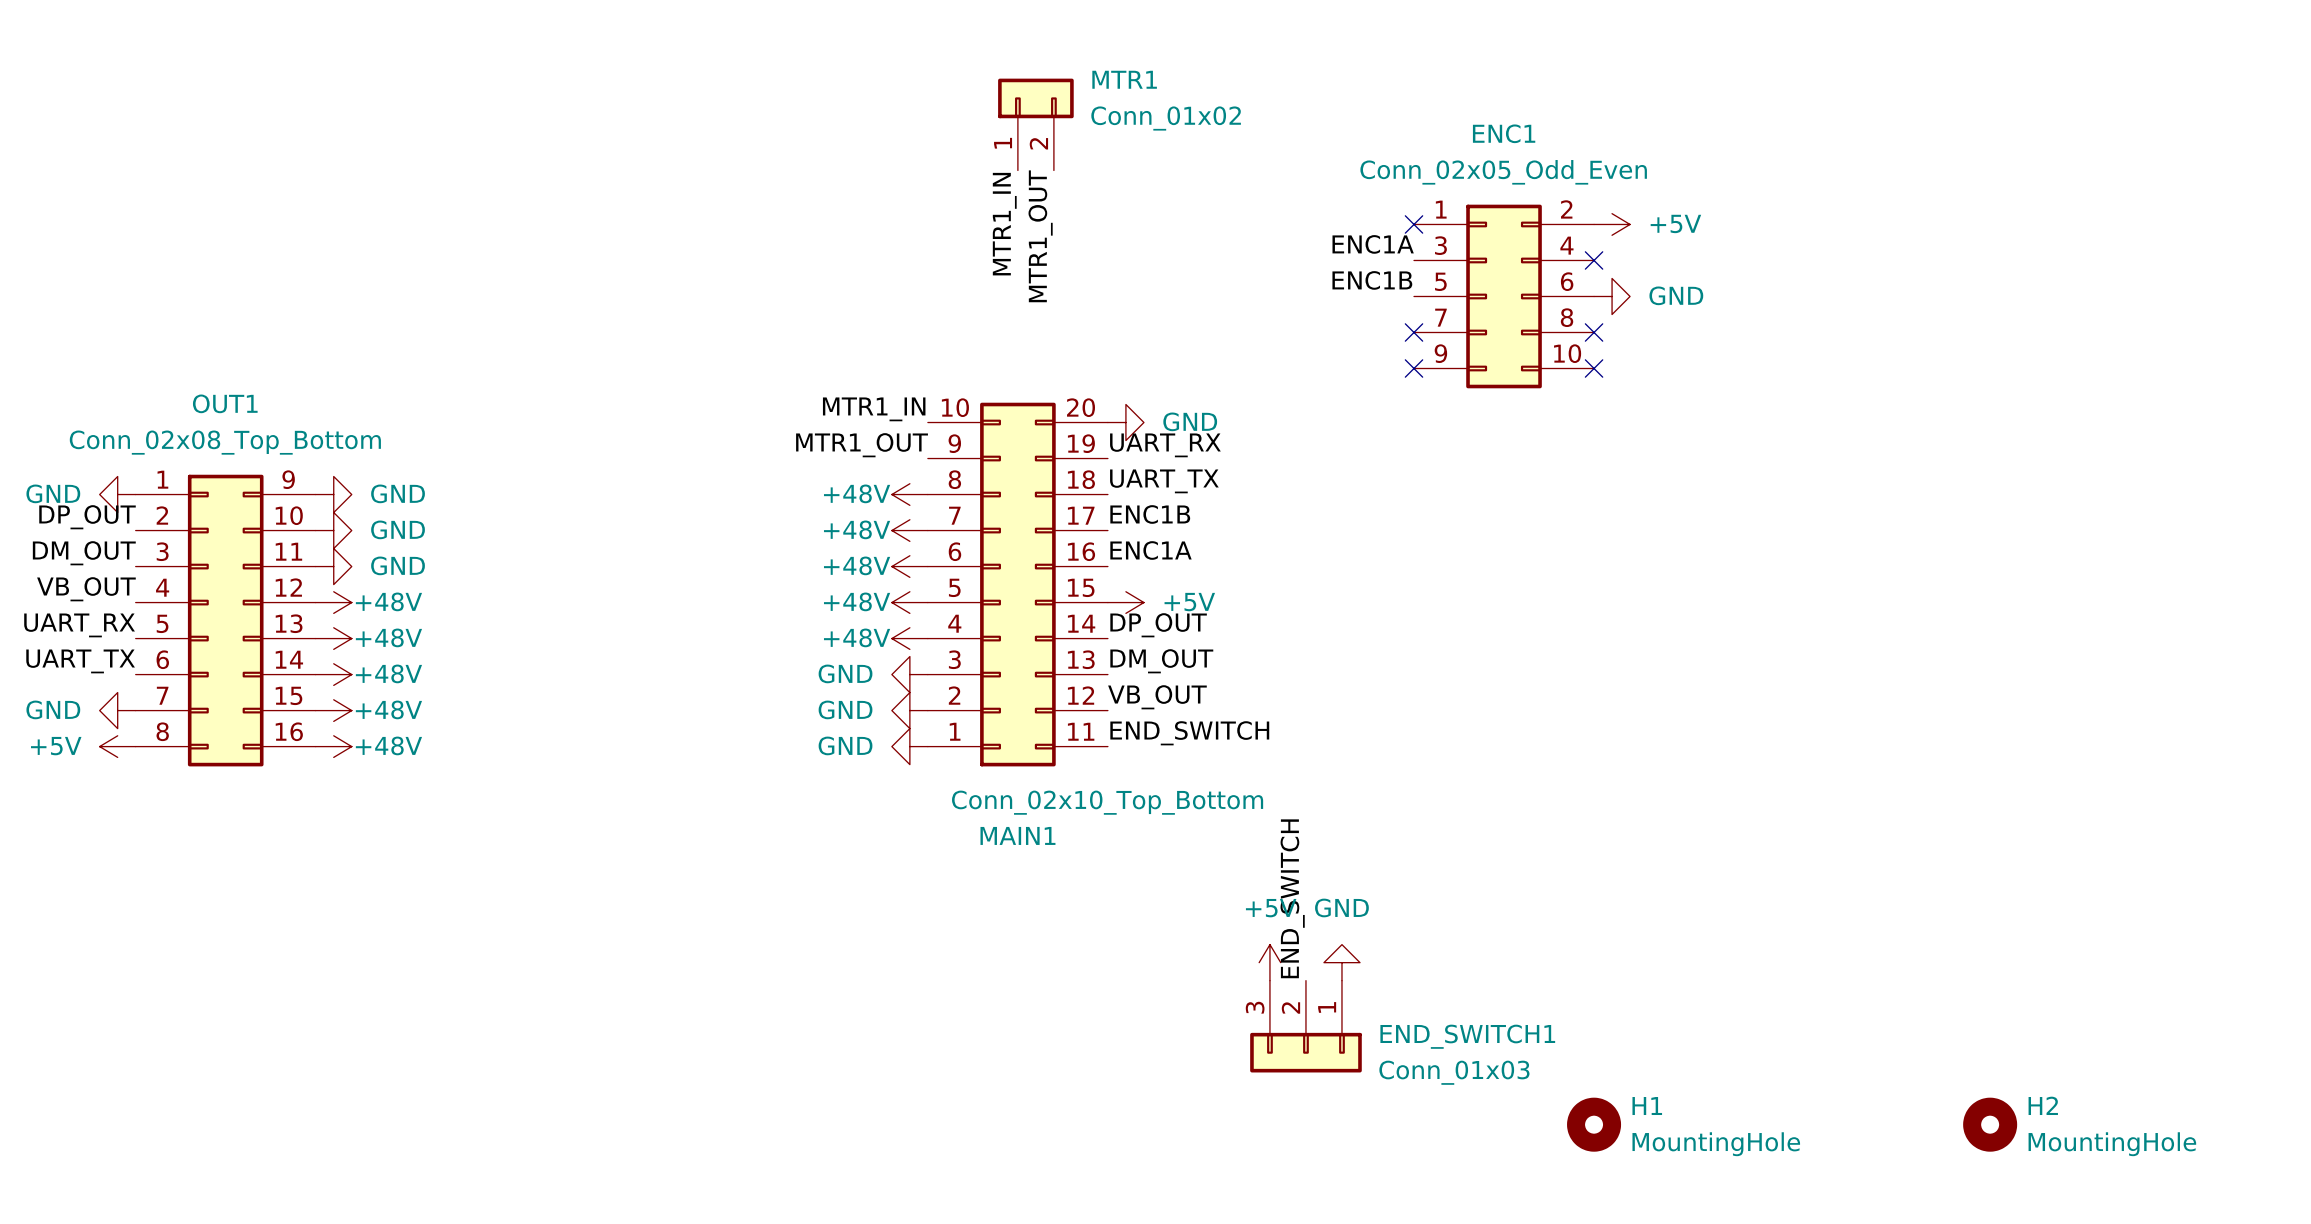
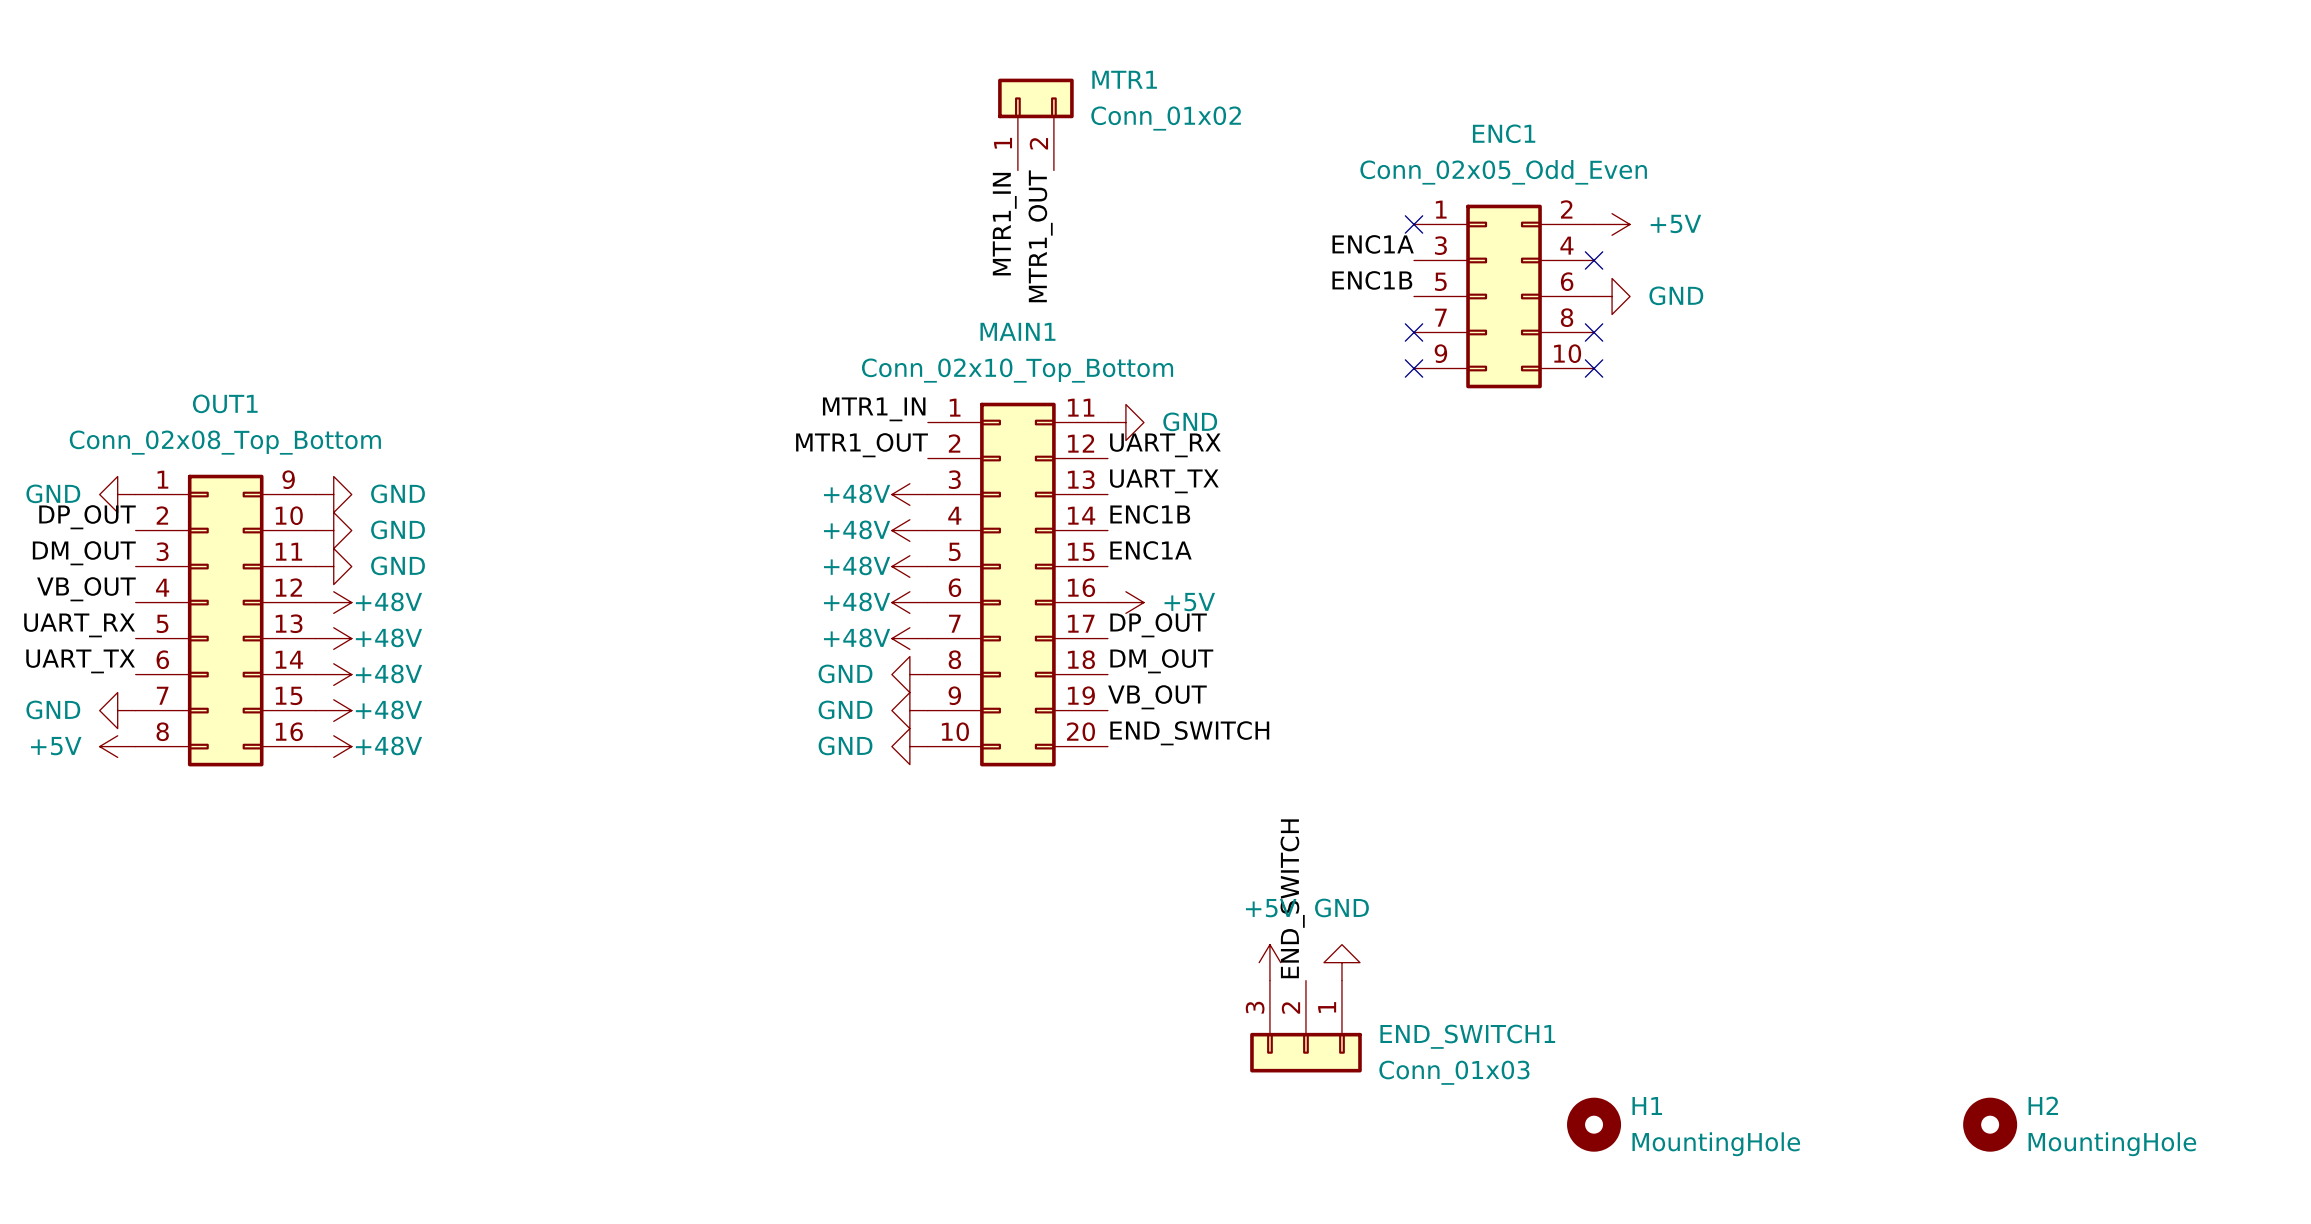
MAIN1 flip: as is (1017, 584) -> up-down (1017, 584)
MAIN1 value position: Conn_02x10_Top_Bottom (1107, 802) -> Conn_02x10_Top_Bottom (1017, 370)

